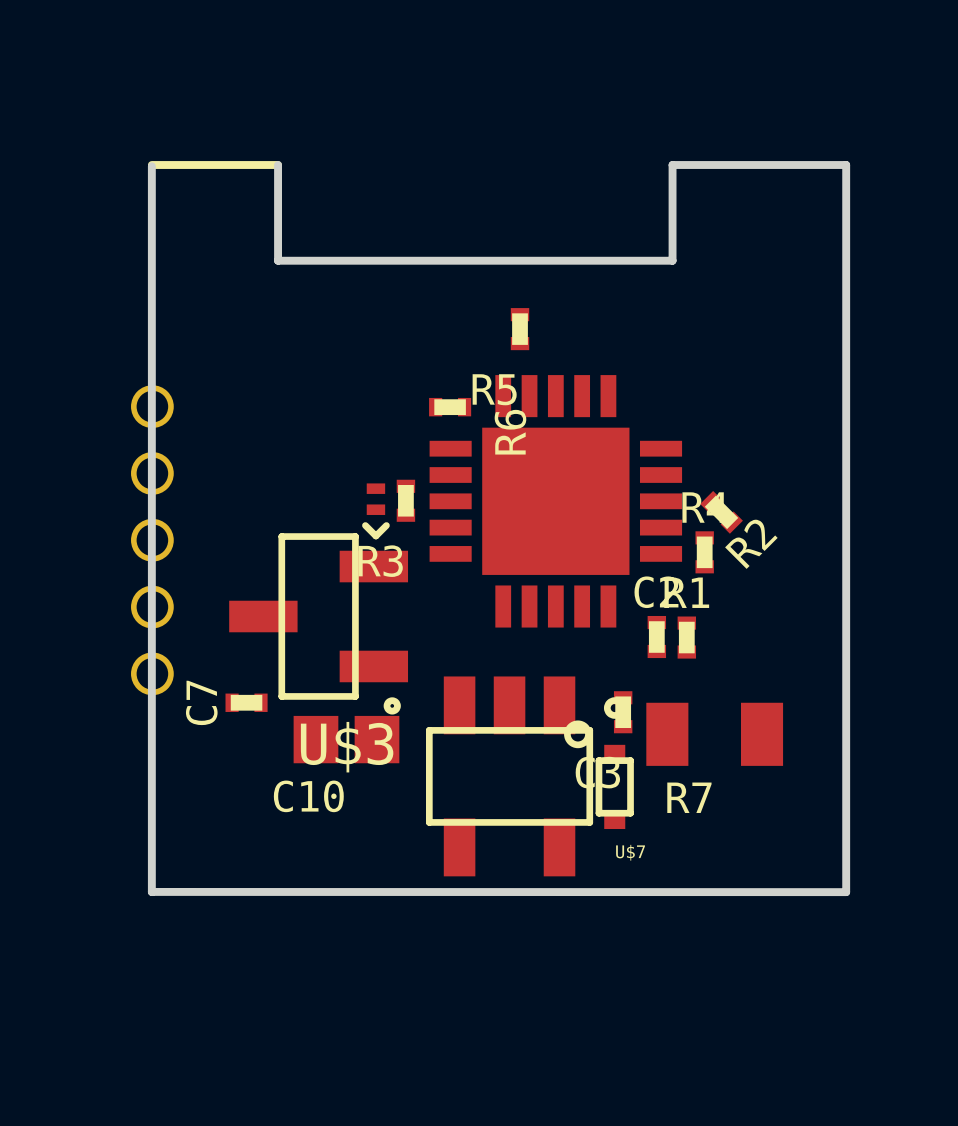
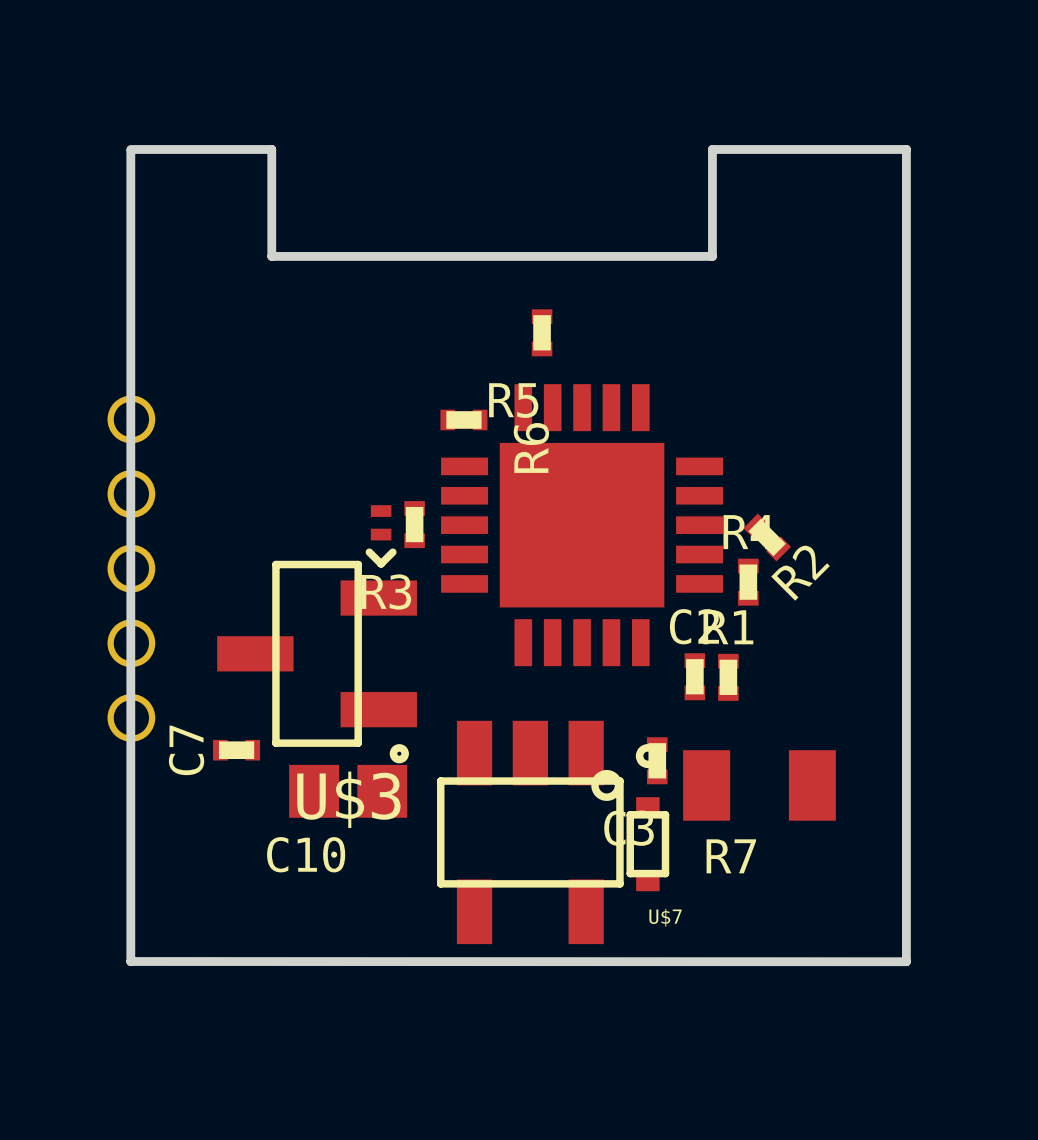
board edge: none -> (130, 149) (271, 149)
line: (151, 165) (278, 165) -> none

